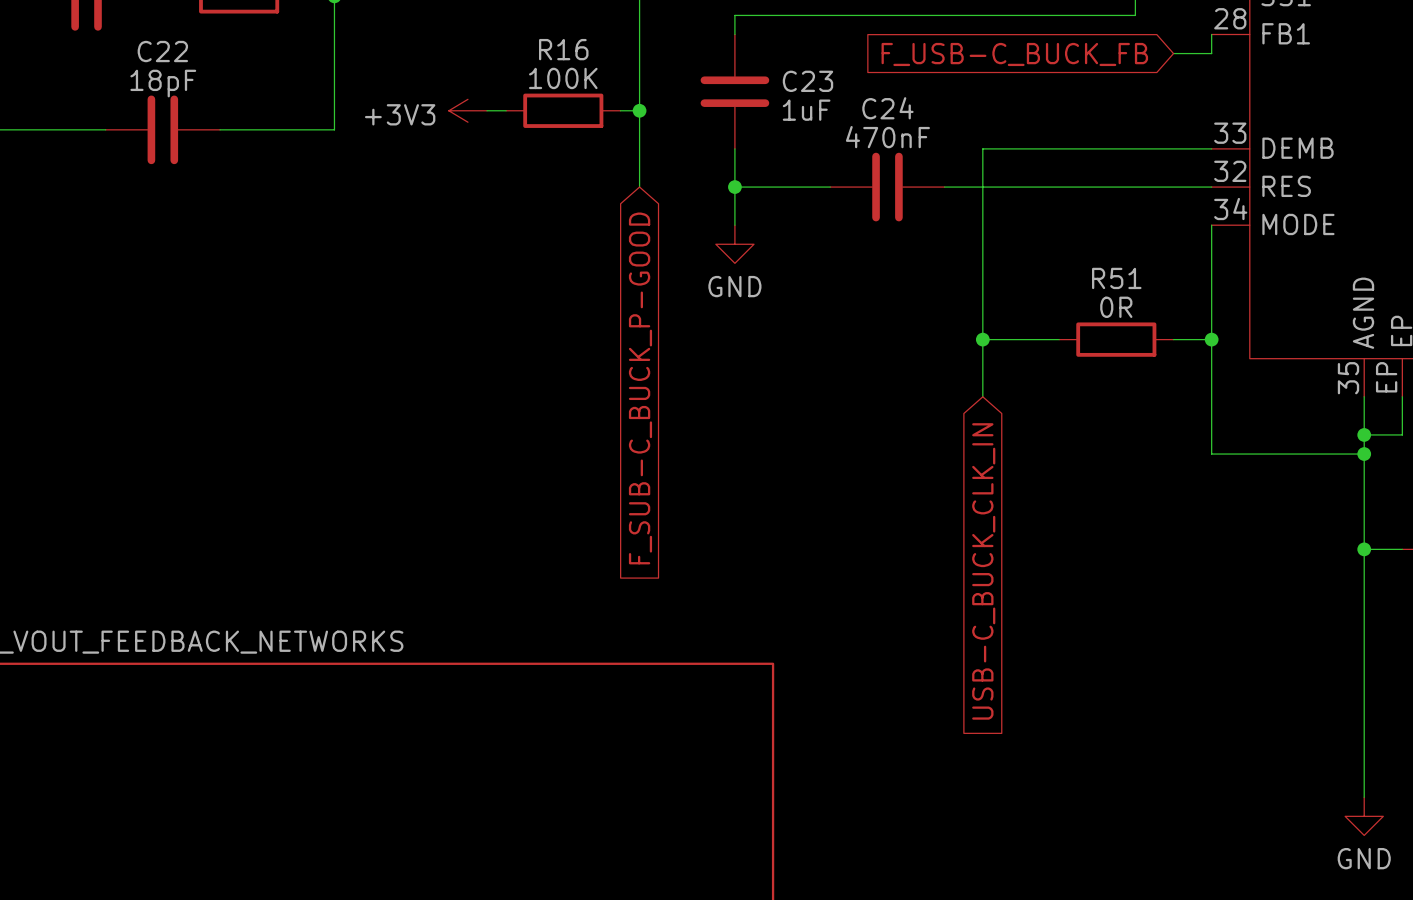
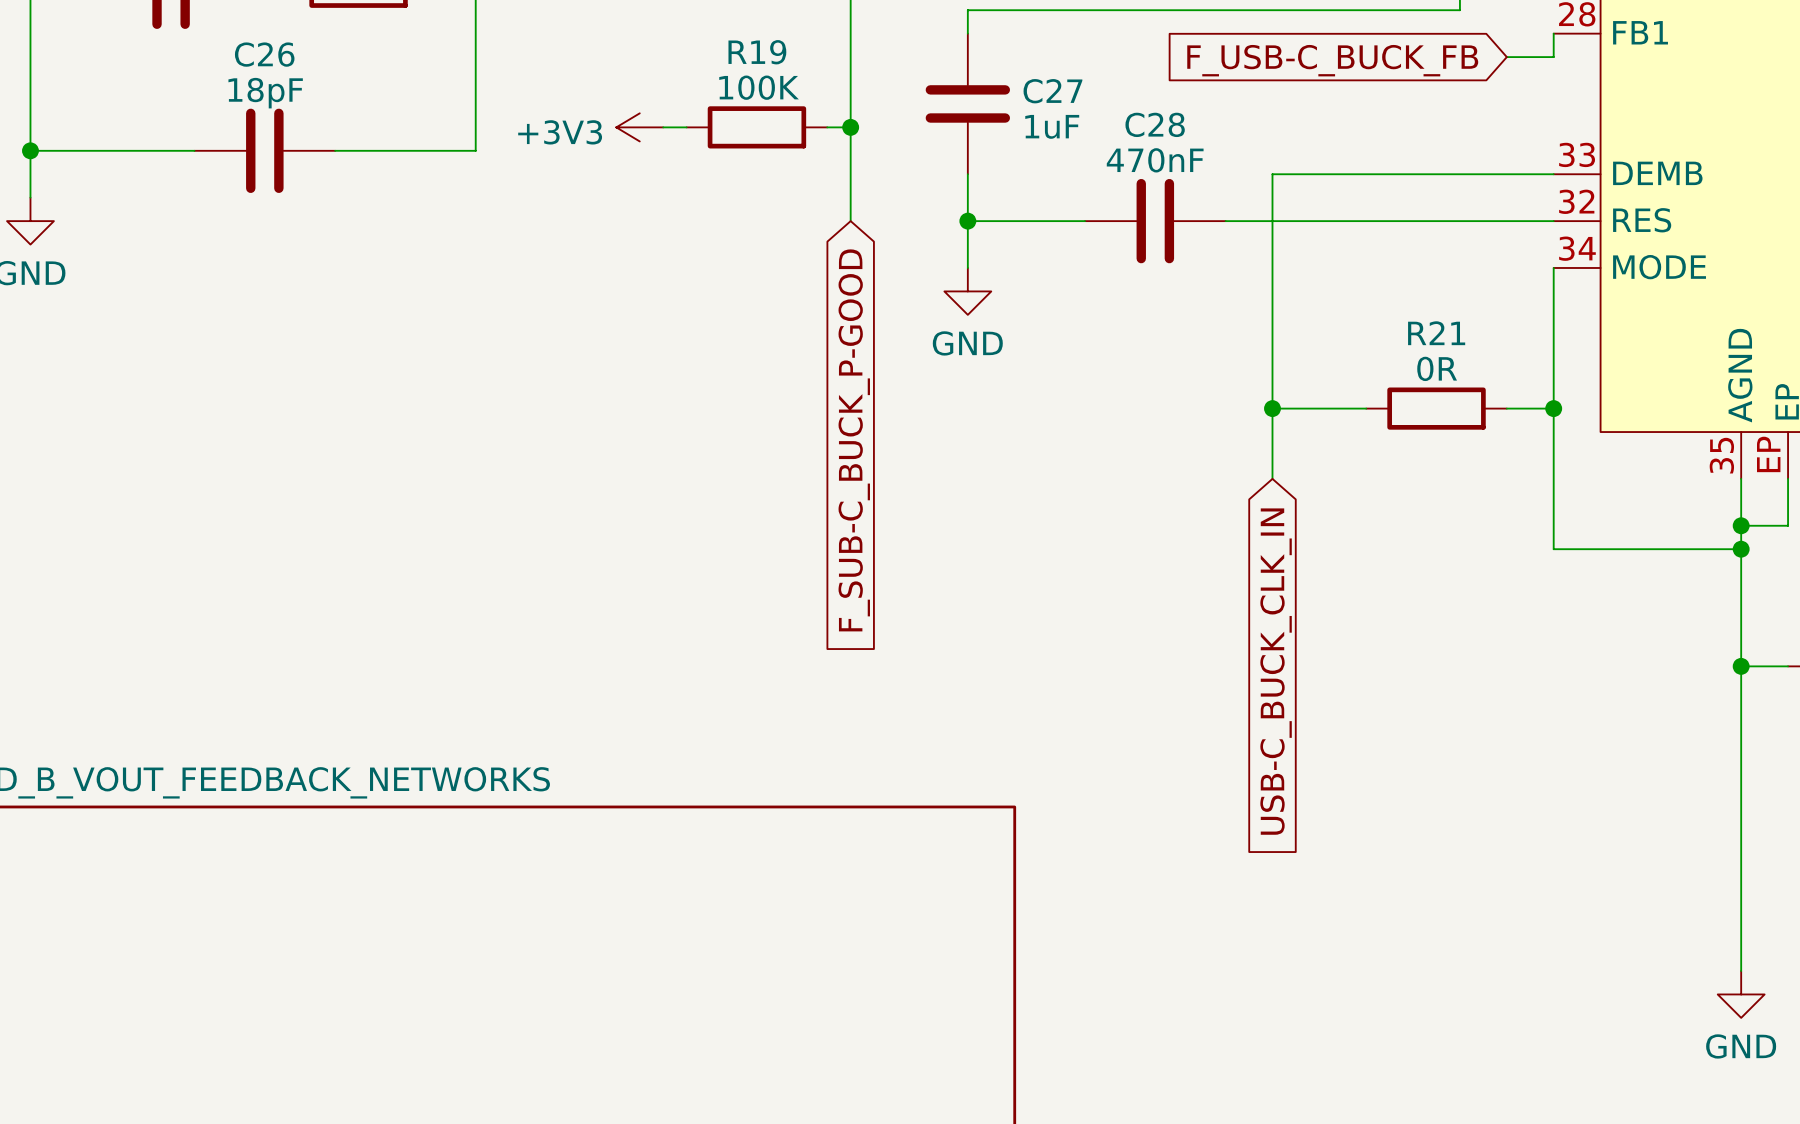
R16 name: R16 (563, 49) -> R19 (757, 52)
C22 name: C22 (162, 51) -> C26 (264, 54)
C23 name: C23 (807, 81) -> C27 (1052, 91)
C24 name: C24 (887, 108) -> C28 (1155, 124)
R51 name: R51 (1116, 278) -> R21 (1436, 333)

